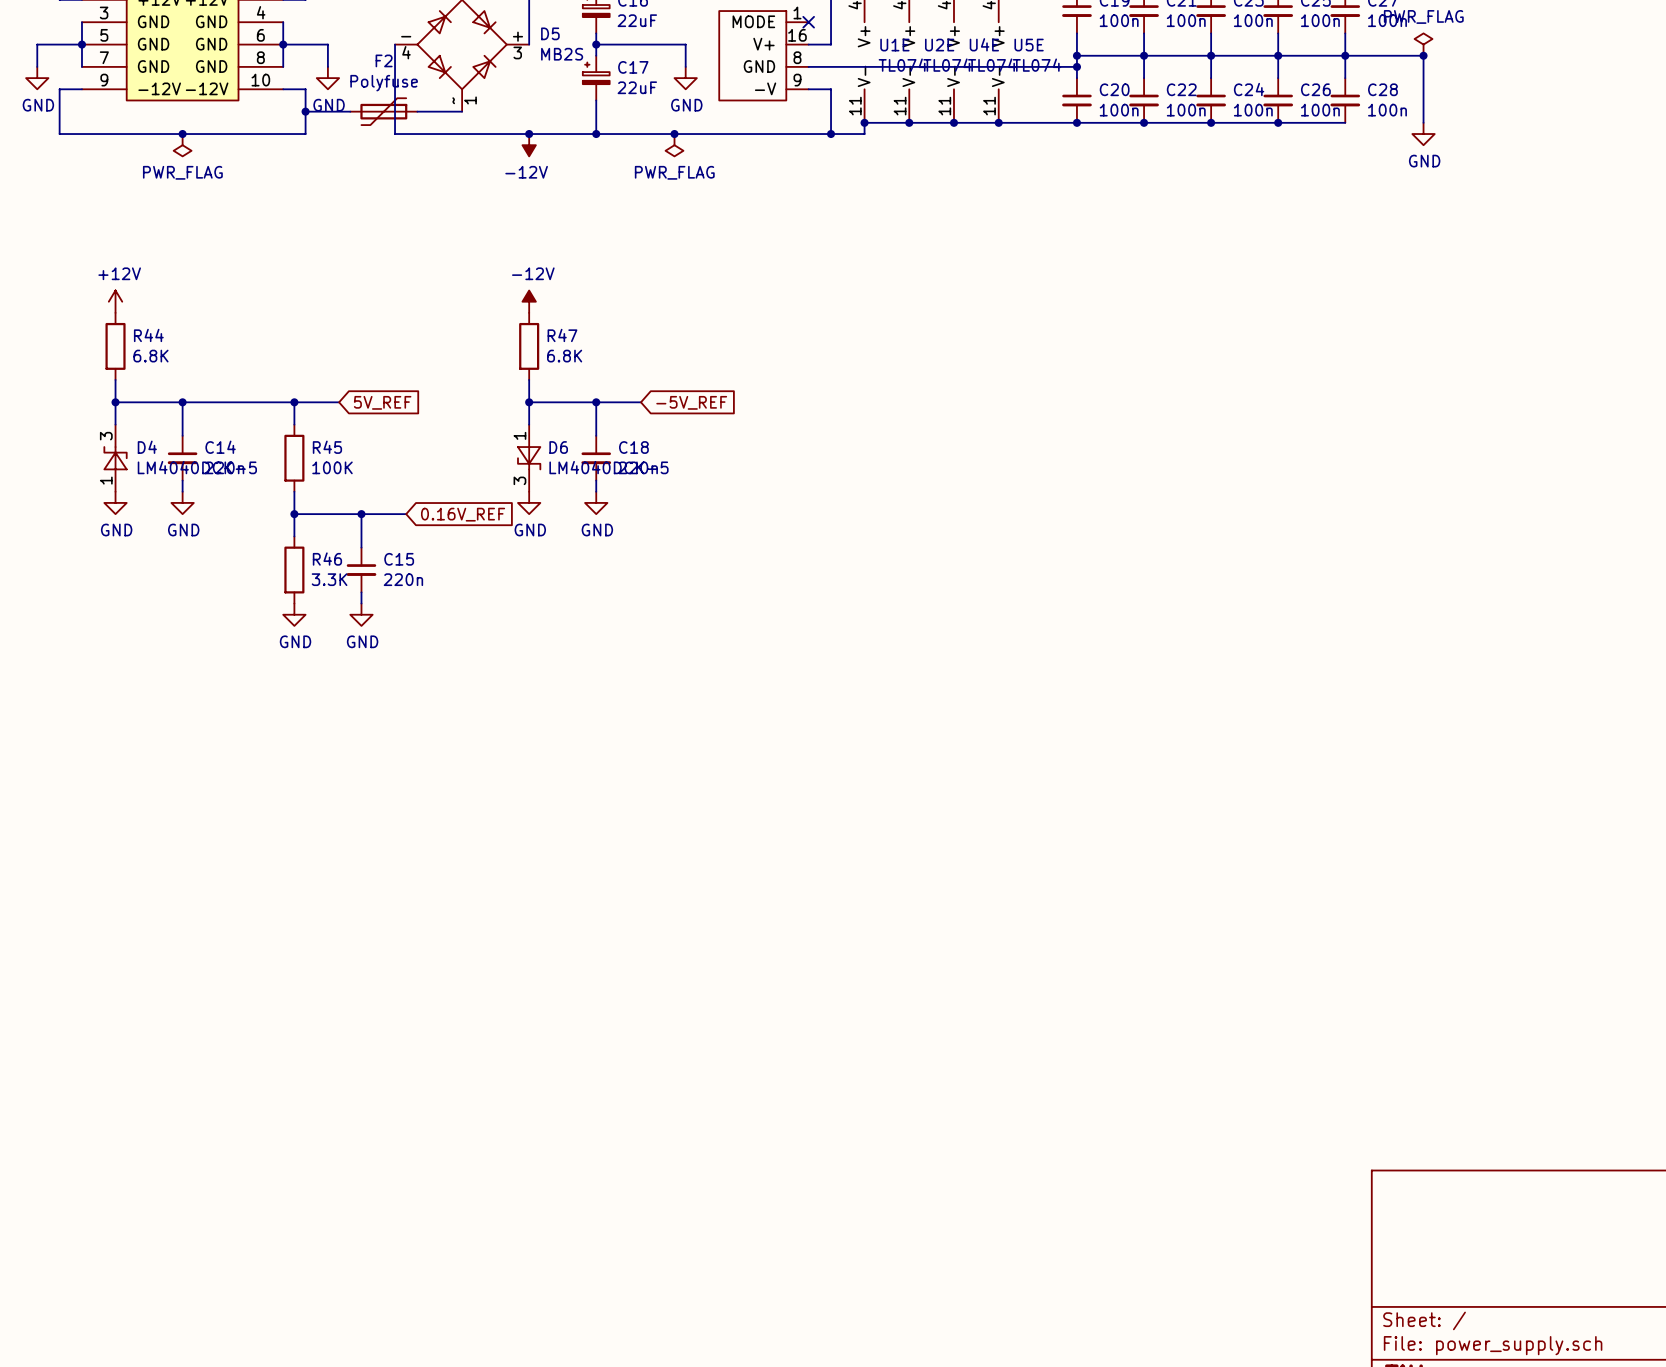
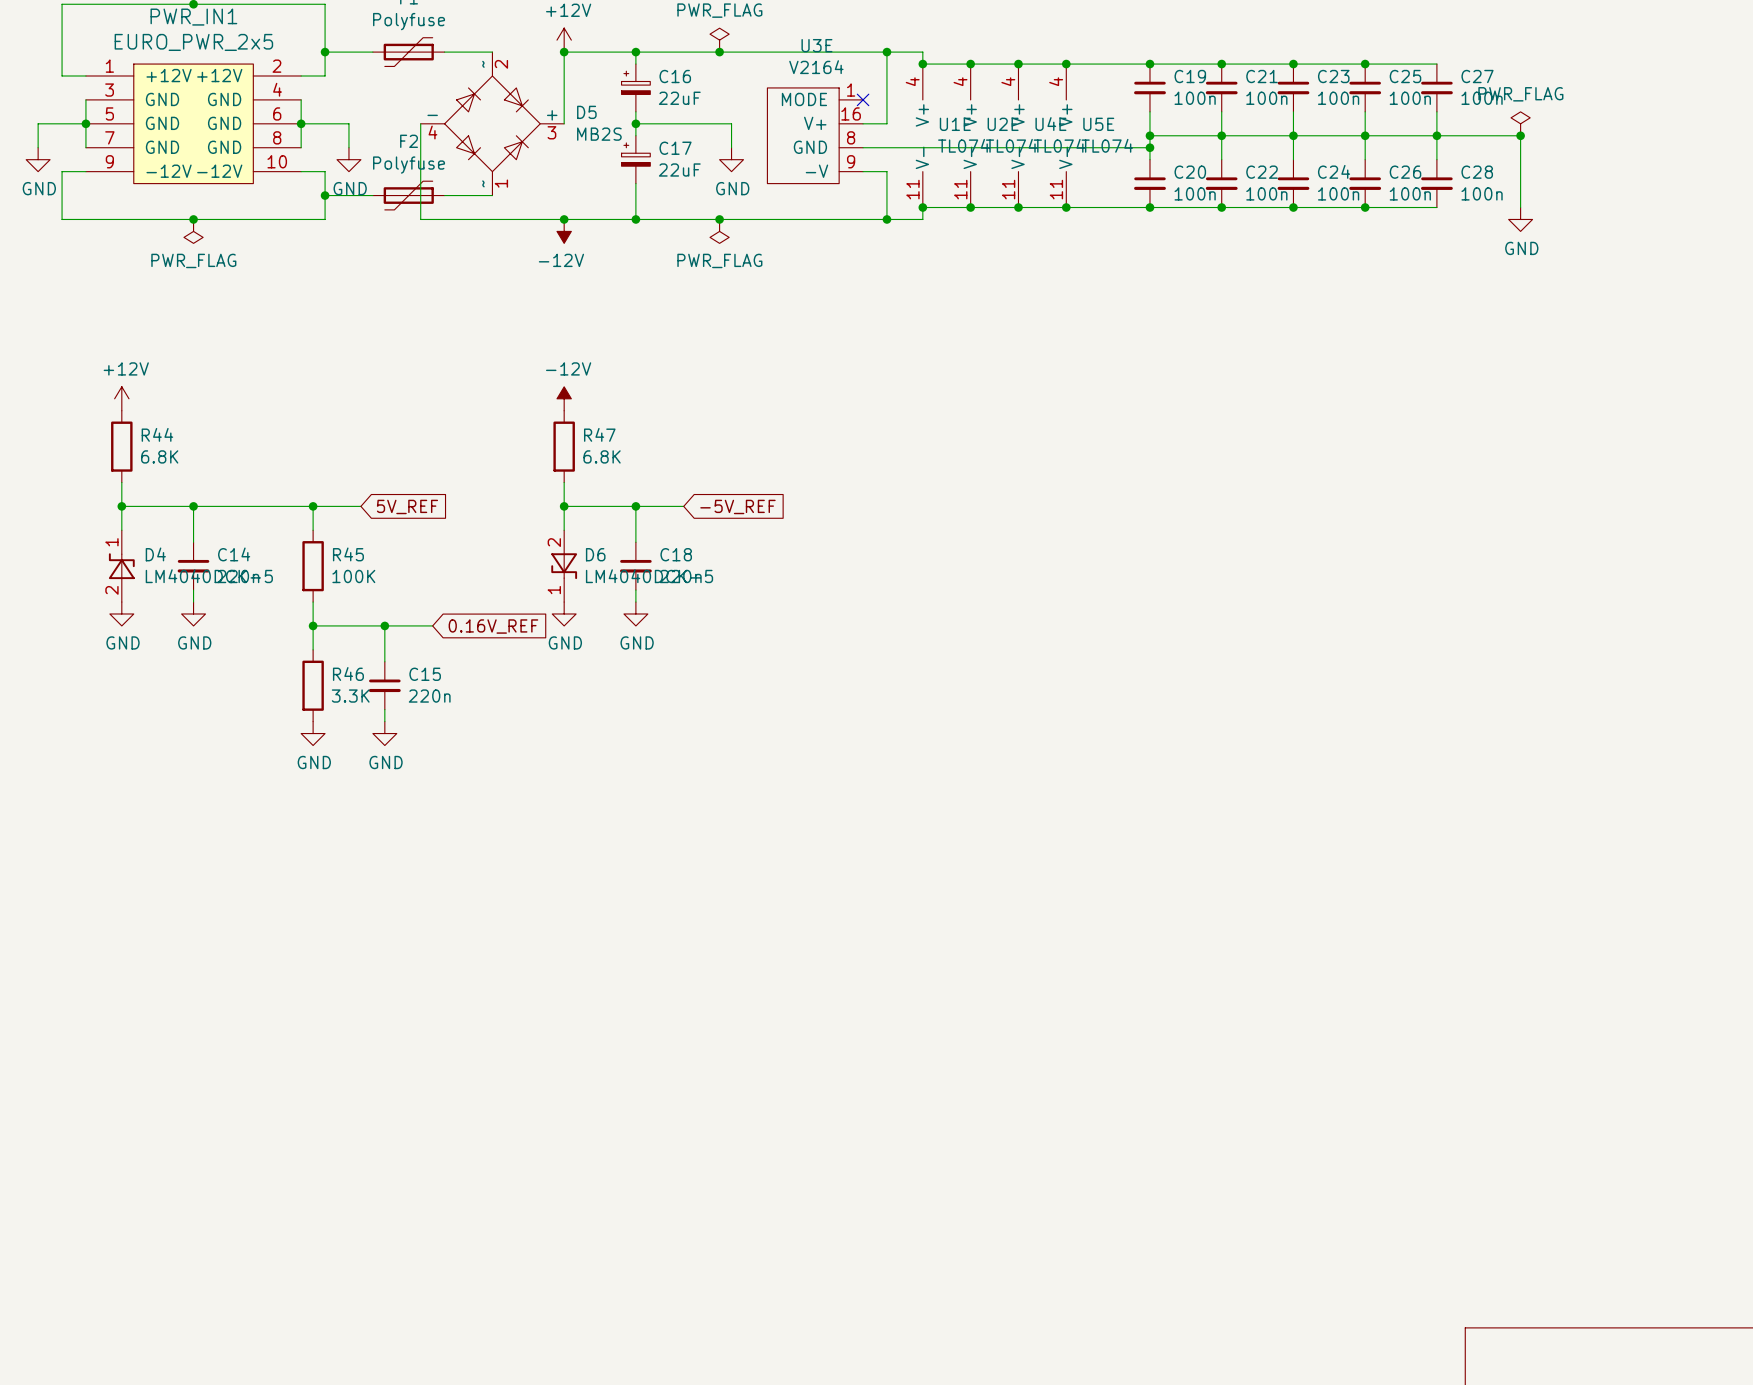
D6 pin number: 1 (519, 435) -> 2 (554, 542)
D4 pin number: 3 (106, 436) -> 1 (111, 542)
D4 pin number: 1 (106, 480) -> 2 (111, 590)
D6 pin number: 3 (519, 480) -> 1 (554, 590)

